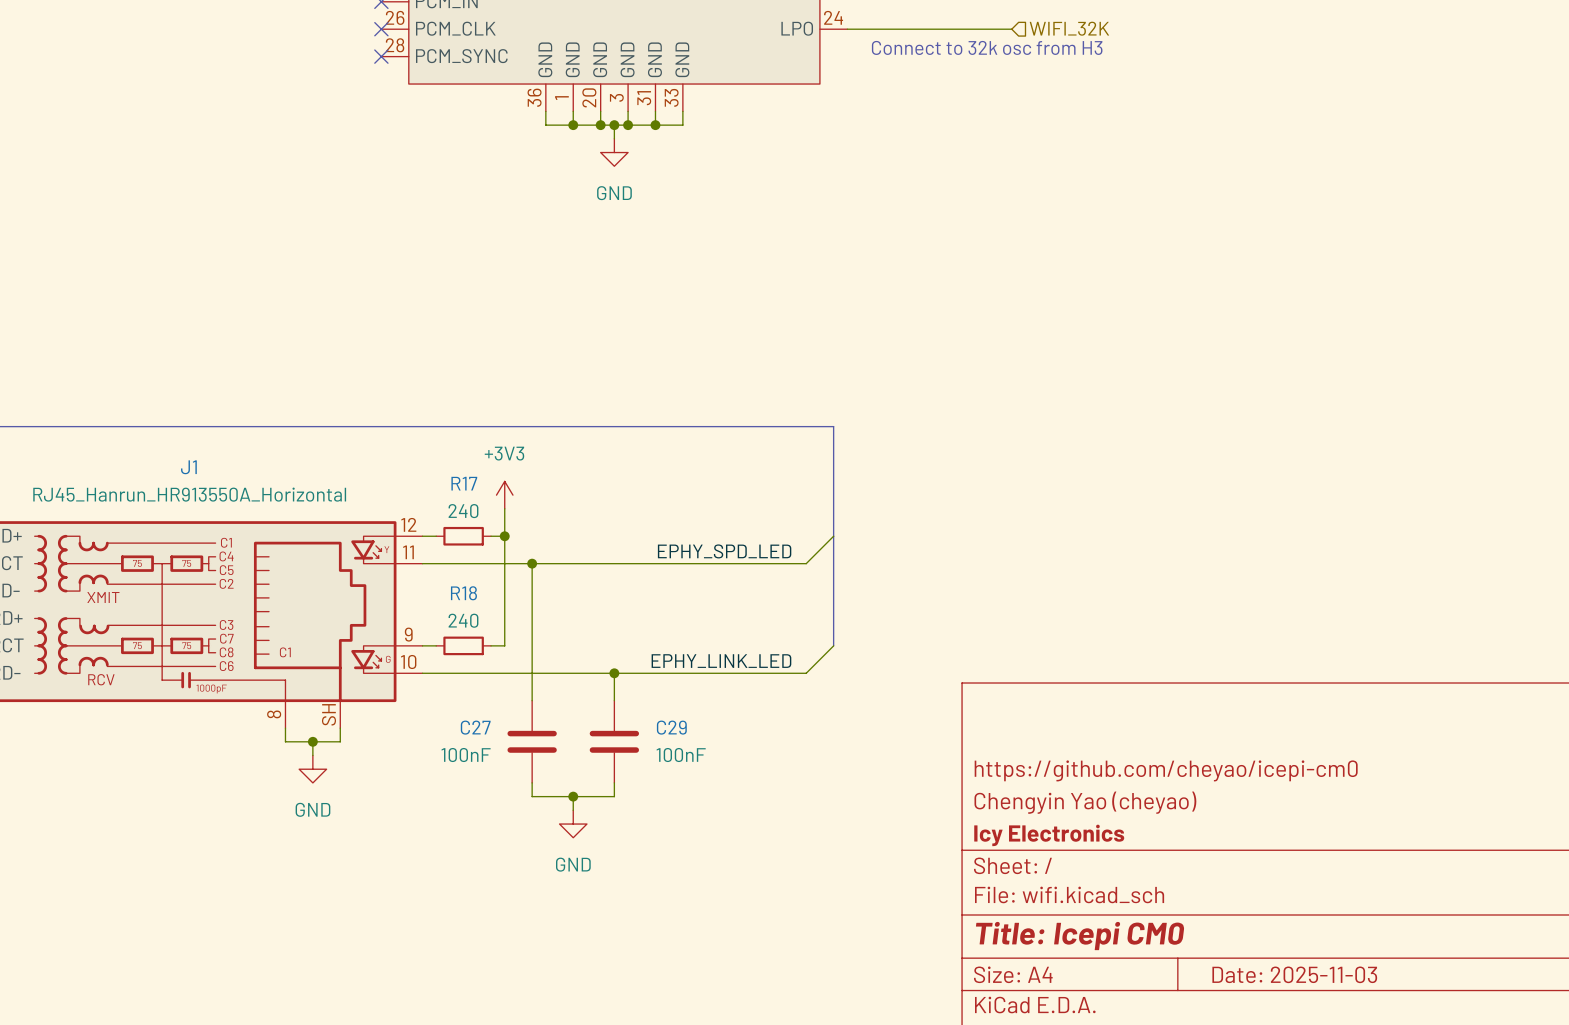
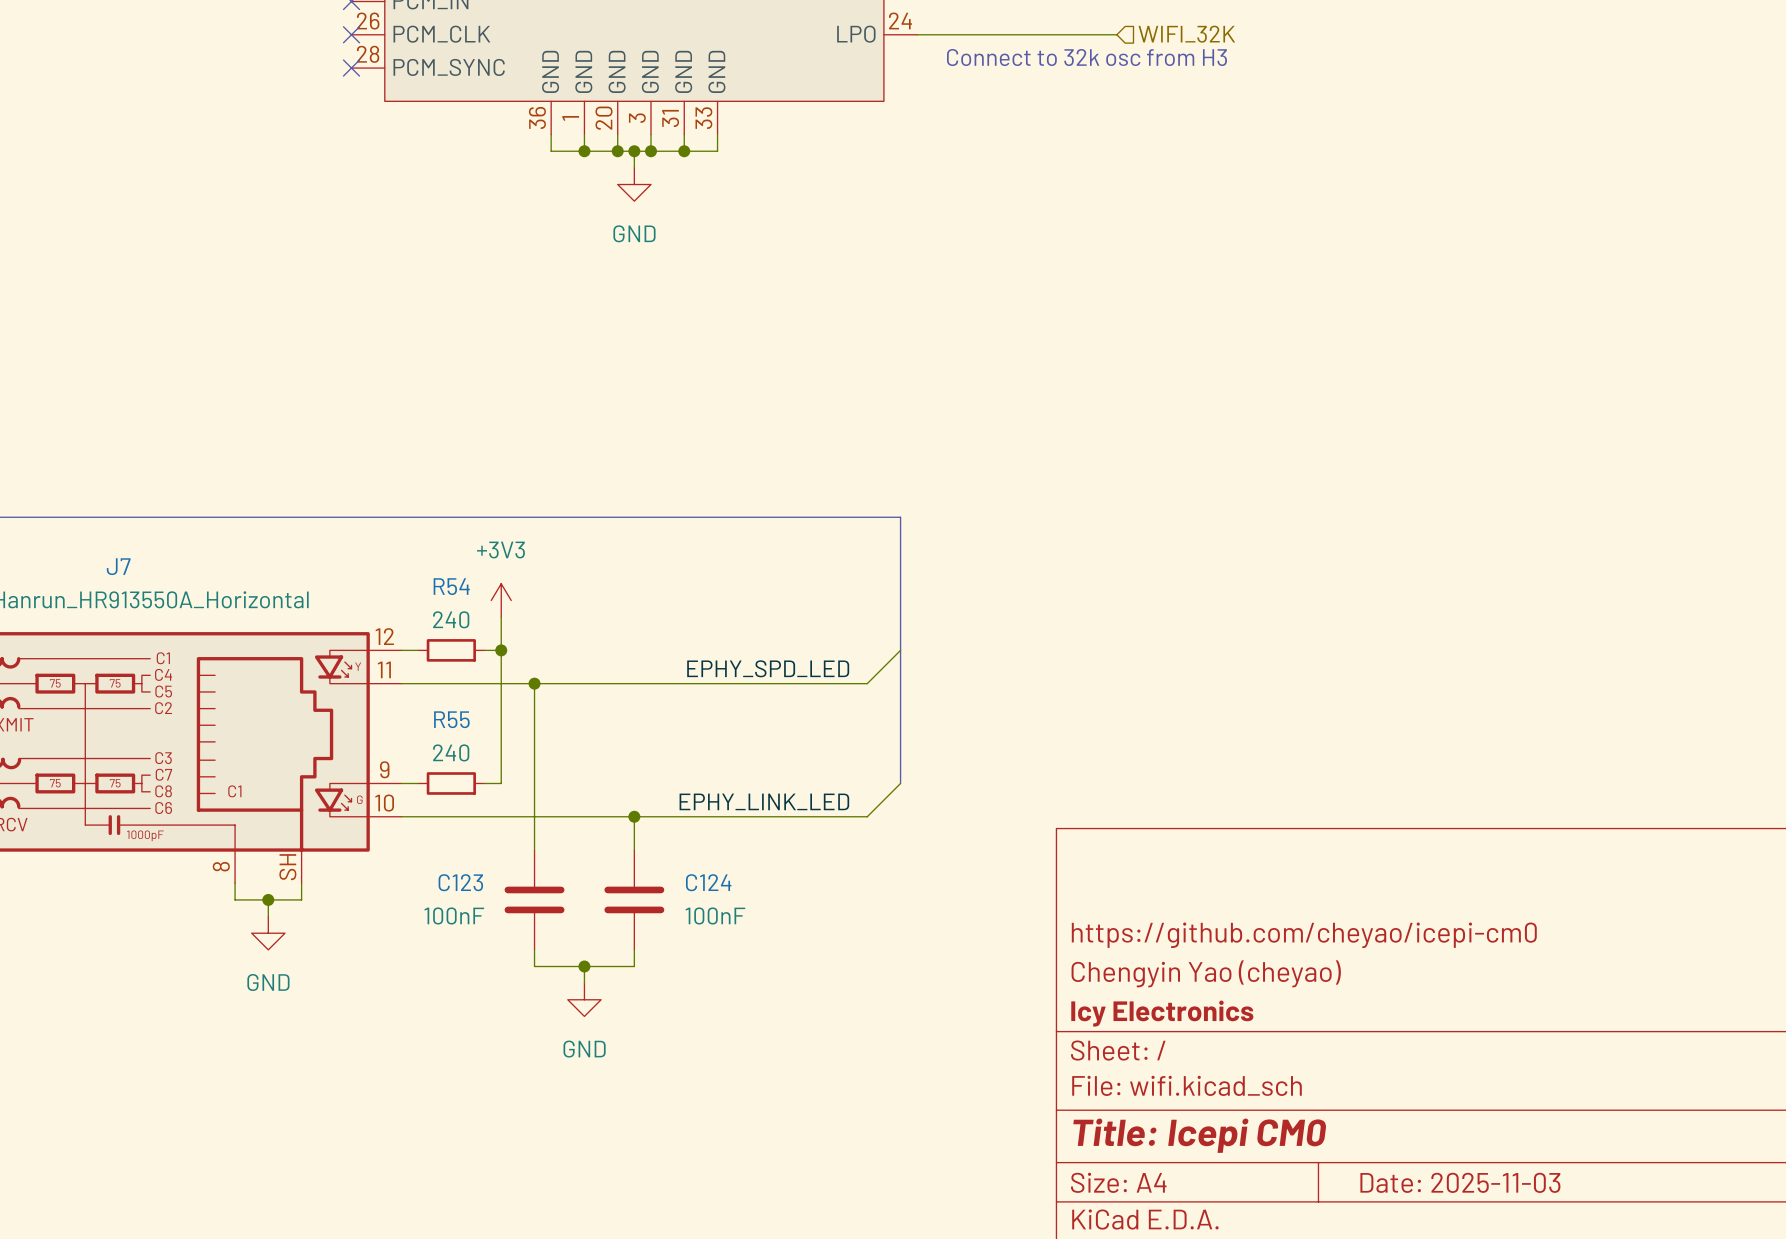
J1 name: J1 (188, 467) -> J7 (118, 566)
R17 name: R17 (464, 483) -> R54 (451, 586)
R18 name: R18 (463, 593) -> R55 (451, 719)
C27 name: C27 (475, 727) -> C123 (460, 882)
C29 name: C29 (671, 727) -> C124 (708, 882)

